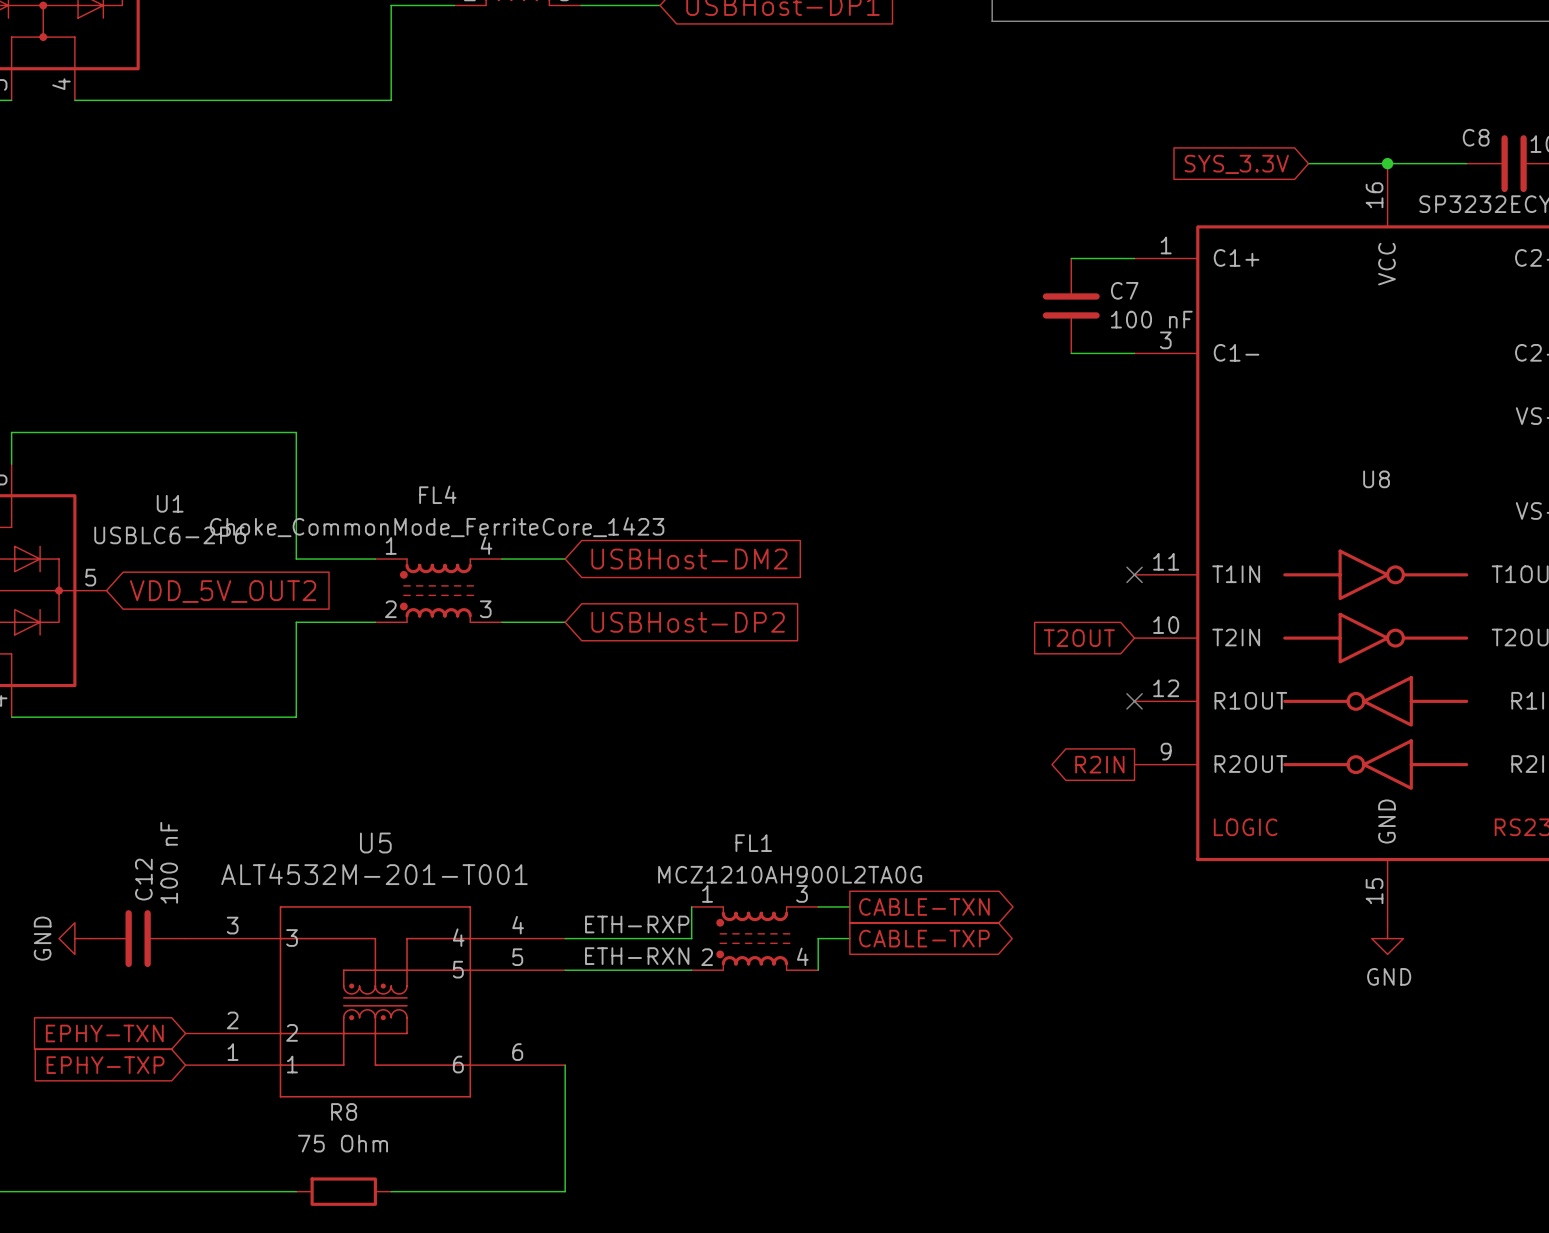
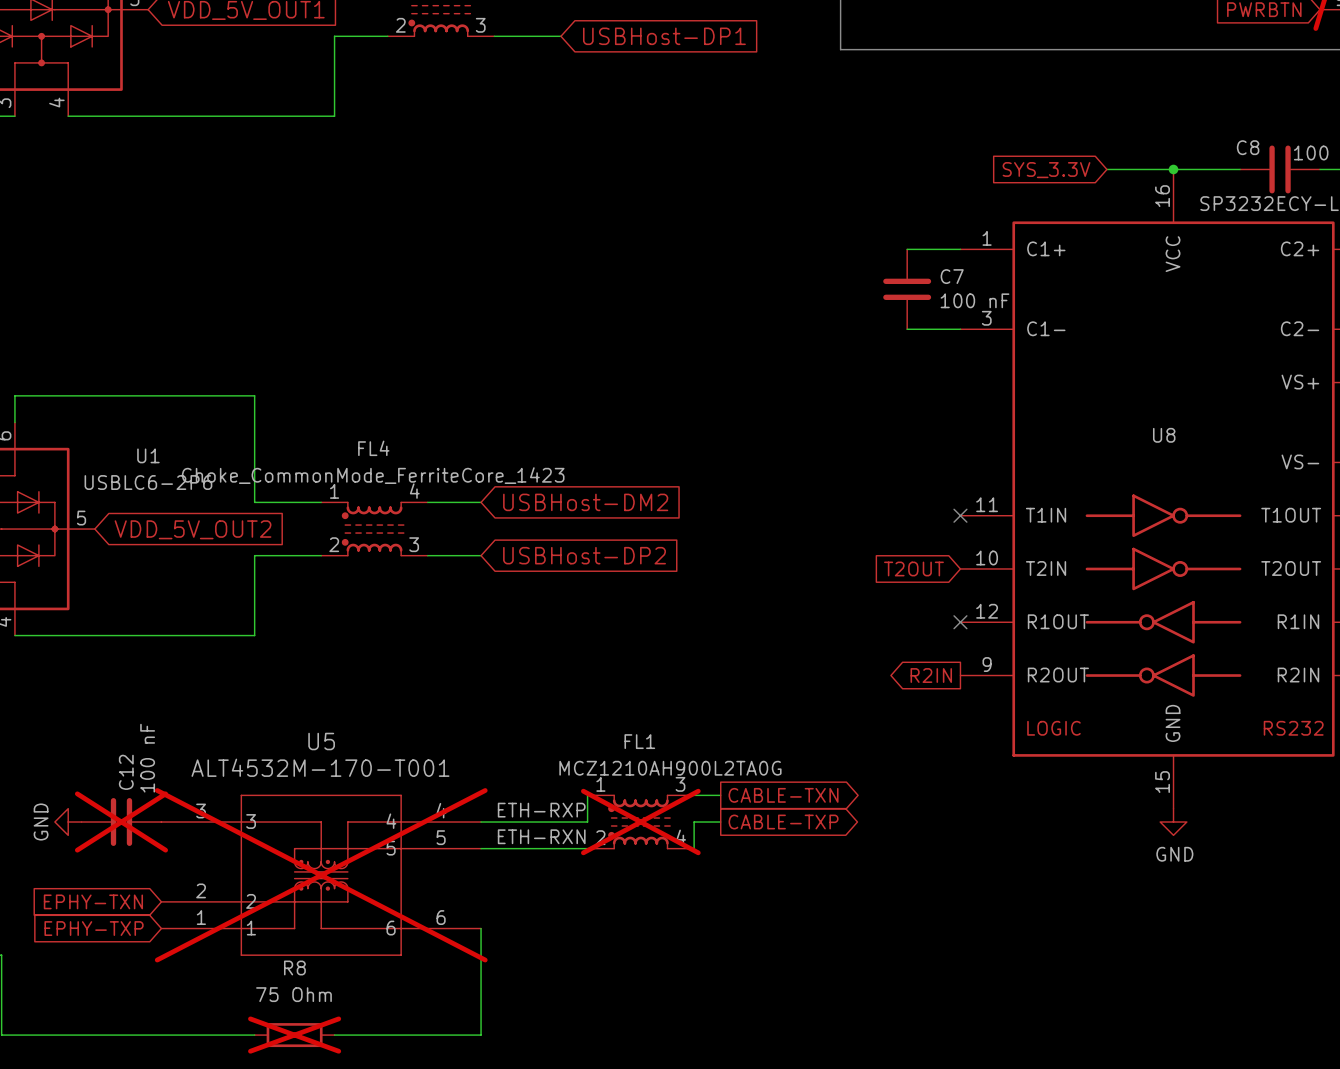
U5 value: ALT4532M-201-T001 (374, 874) -> ALT4532M-170-T001 (320, 767)
C12 do-not-place cross: none -> (121, 822)
FL1 do-not-place cross: none -> (640, 822)
U5 do-not-place cross: none -> (321, 875)
R8 do-not-place cross: none -> (294, 1035)

